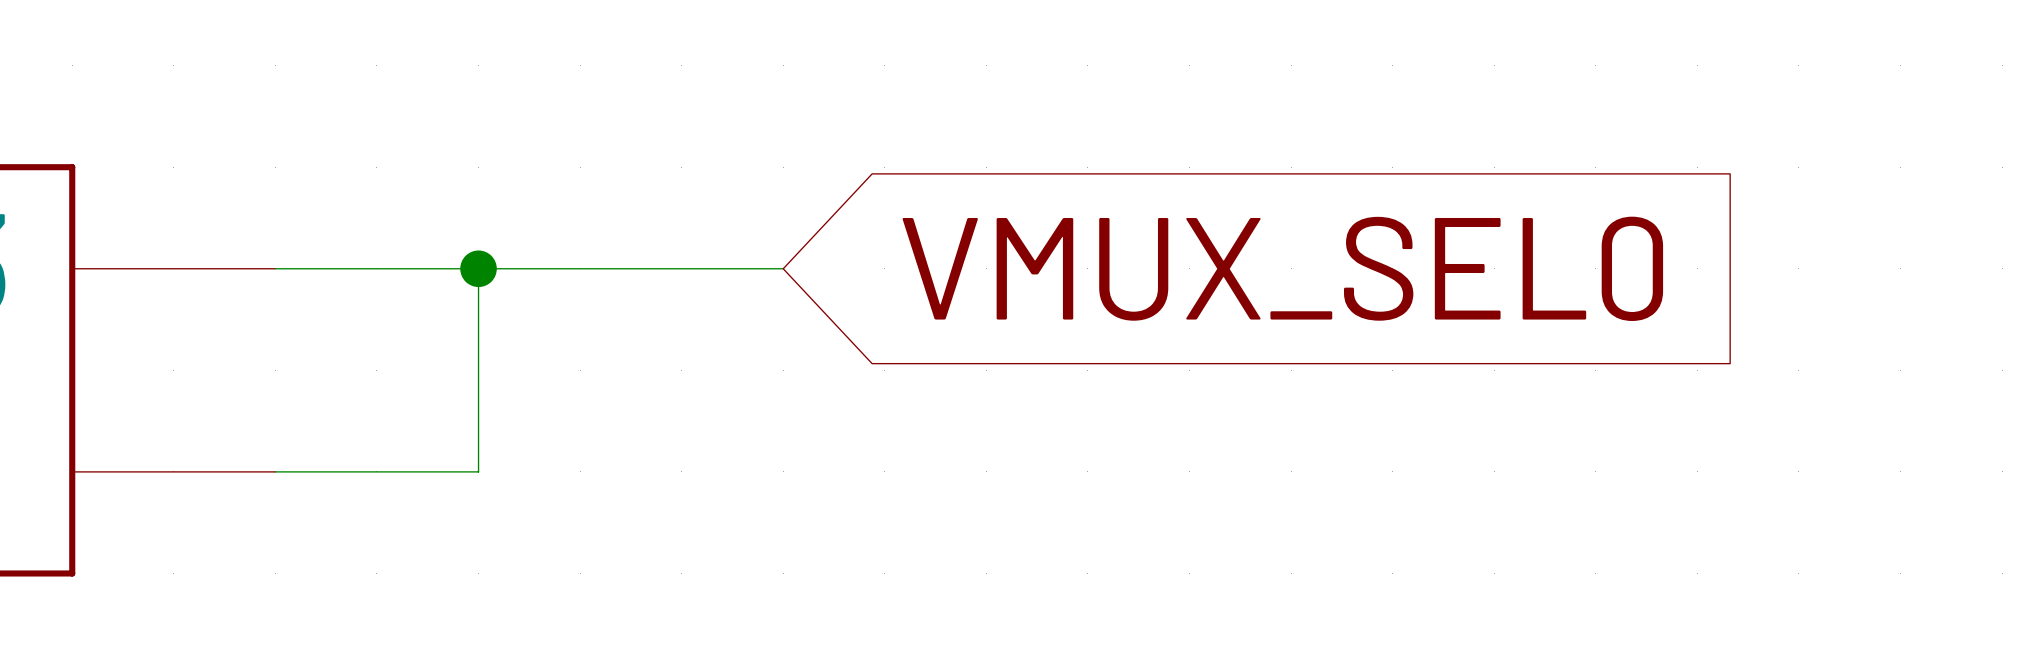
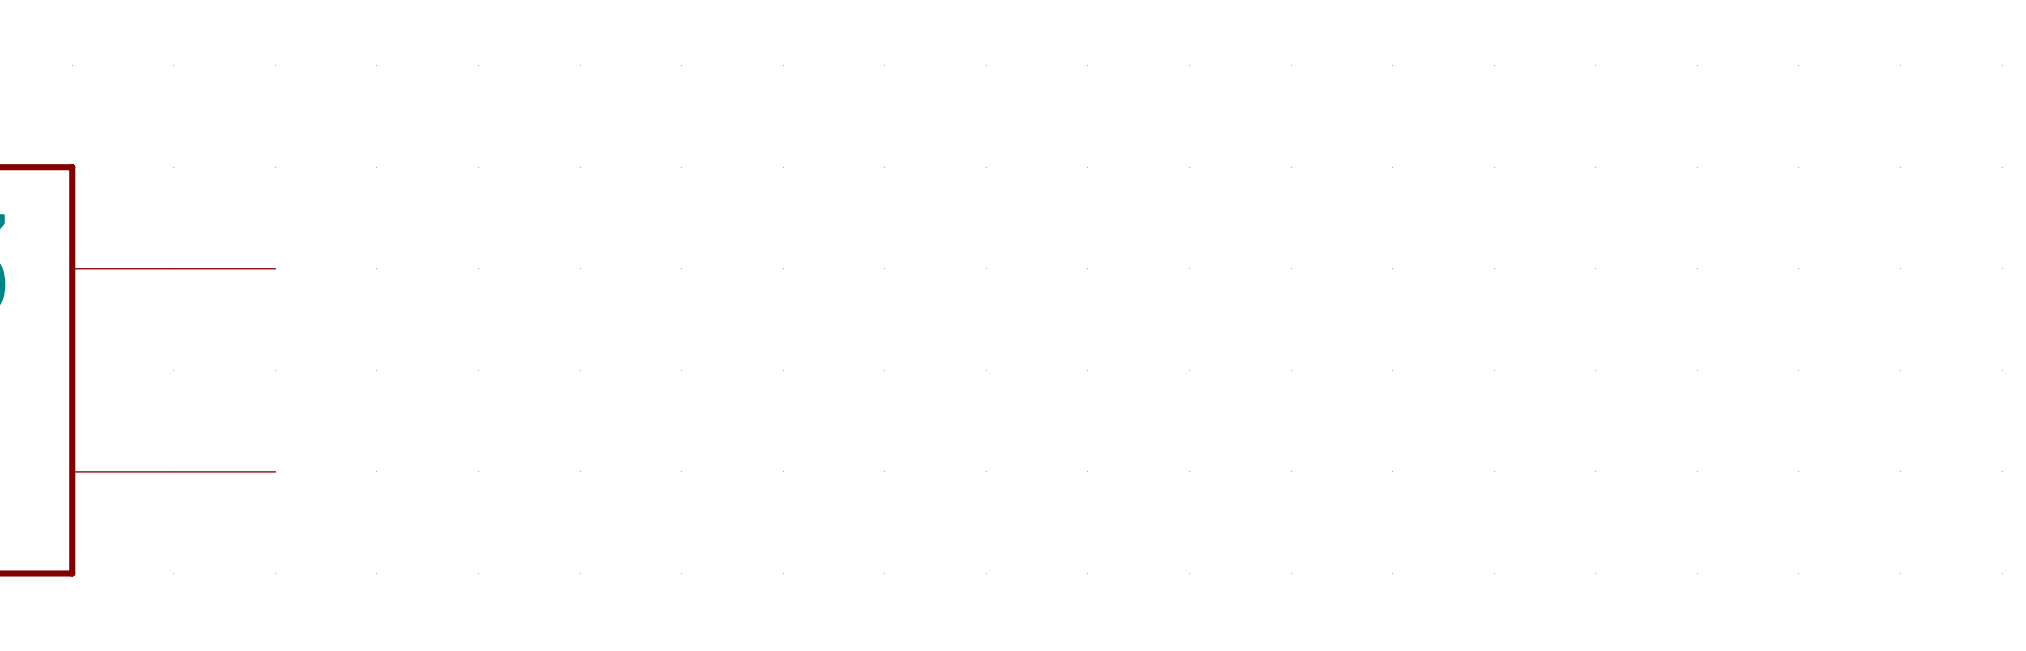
wire: (275, 268) (783, 268) -> none
wire: (478, 268) (478, 471) (275, 471) -> none
junction: (478, 268) -> none
global label: VMUX_SEL0 (1282, 268) -> none

